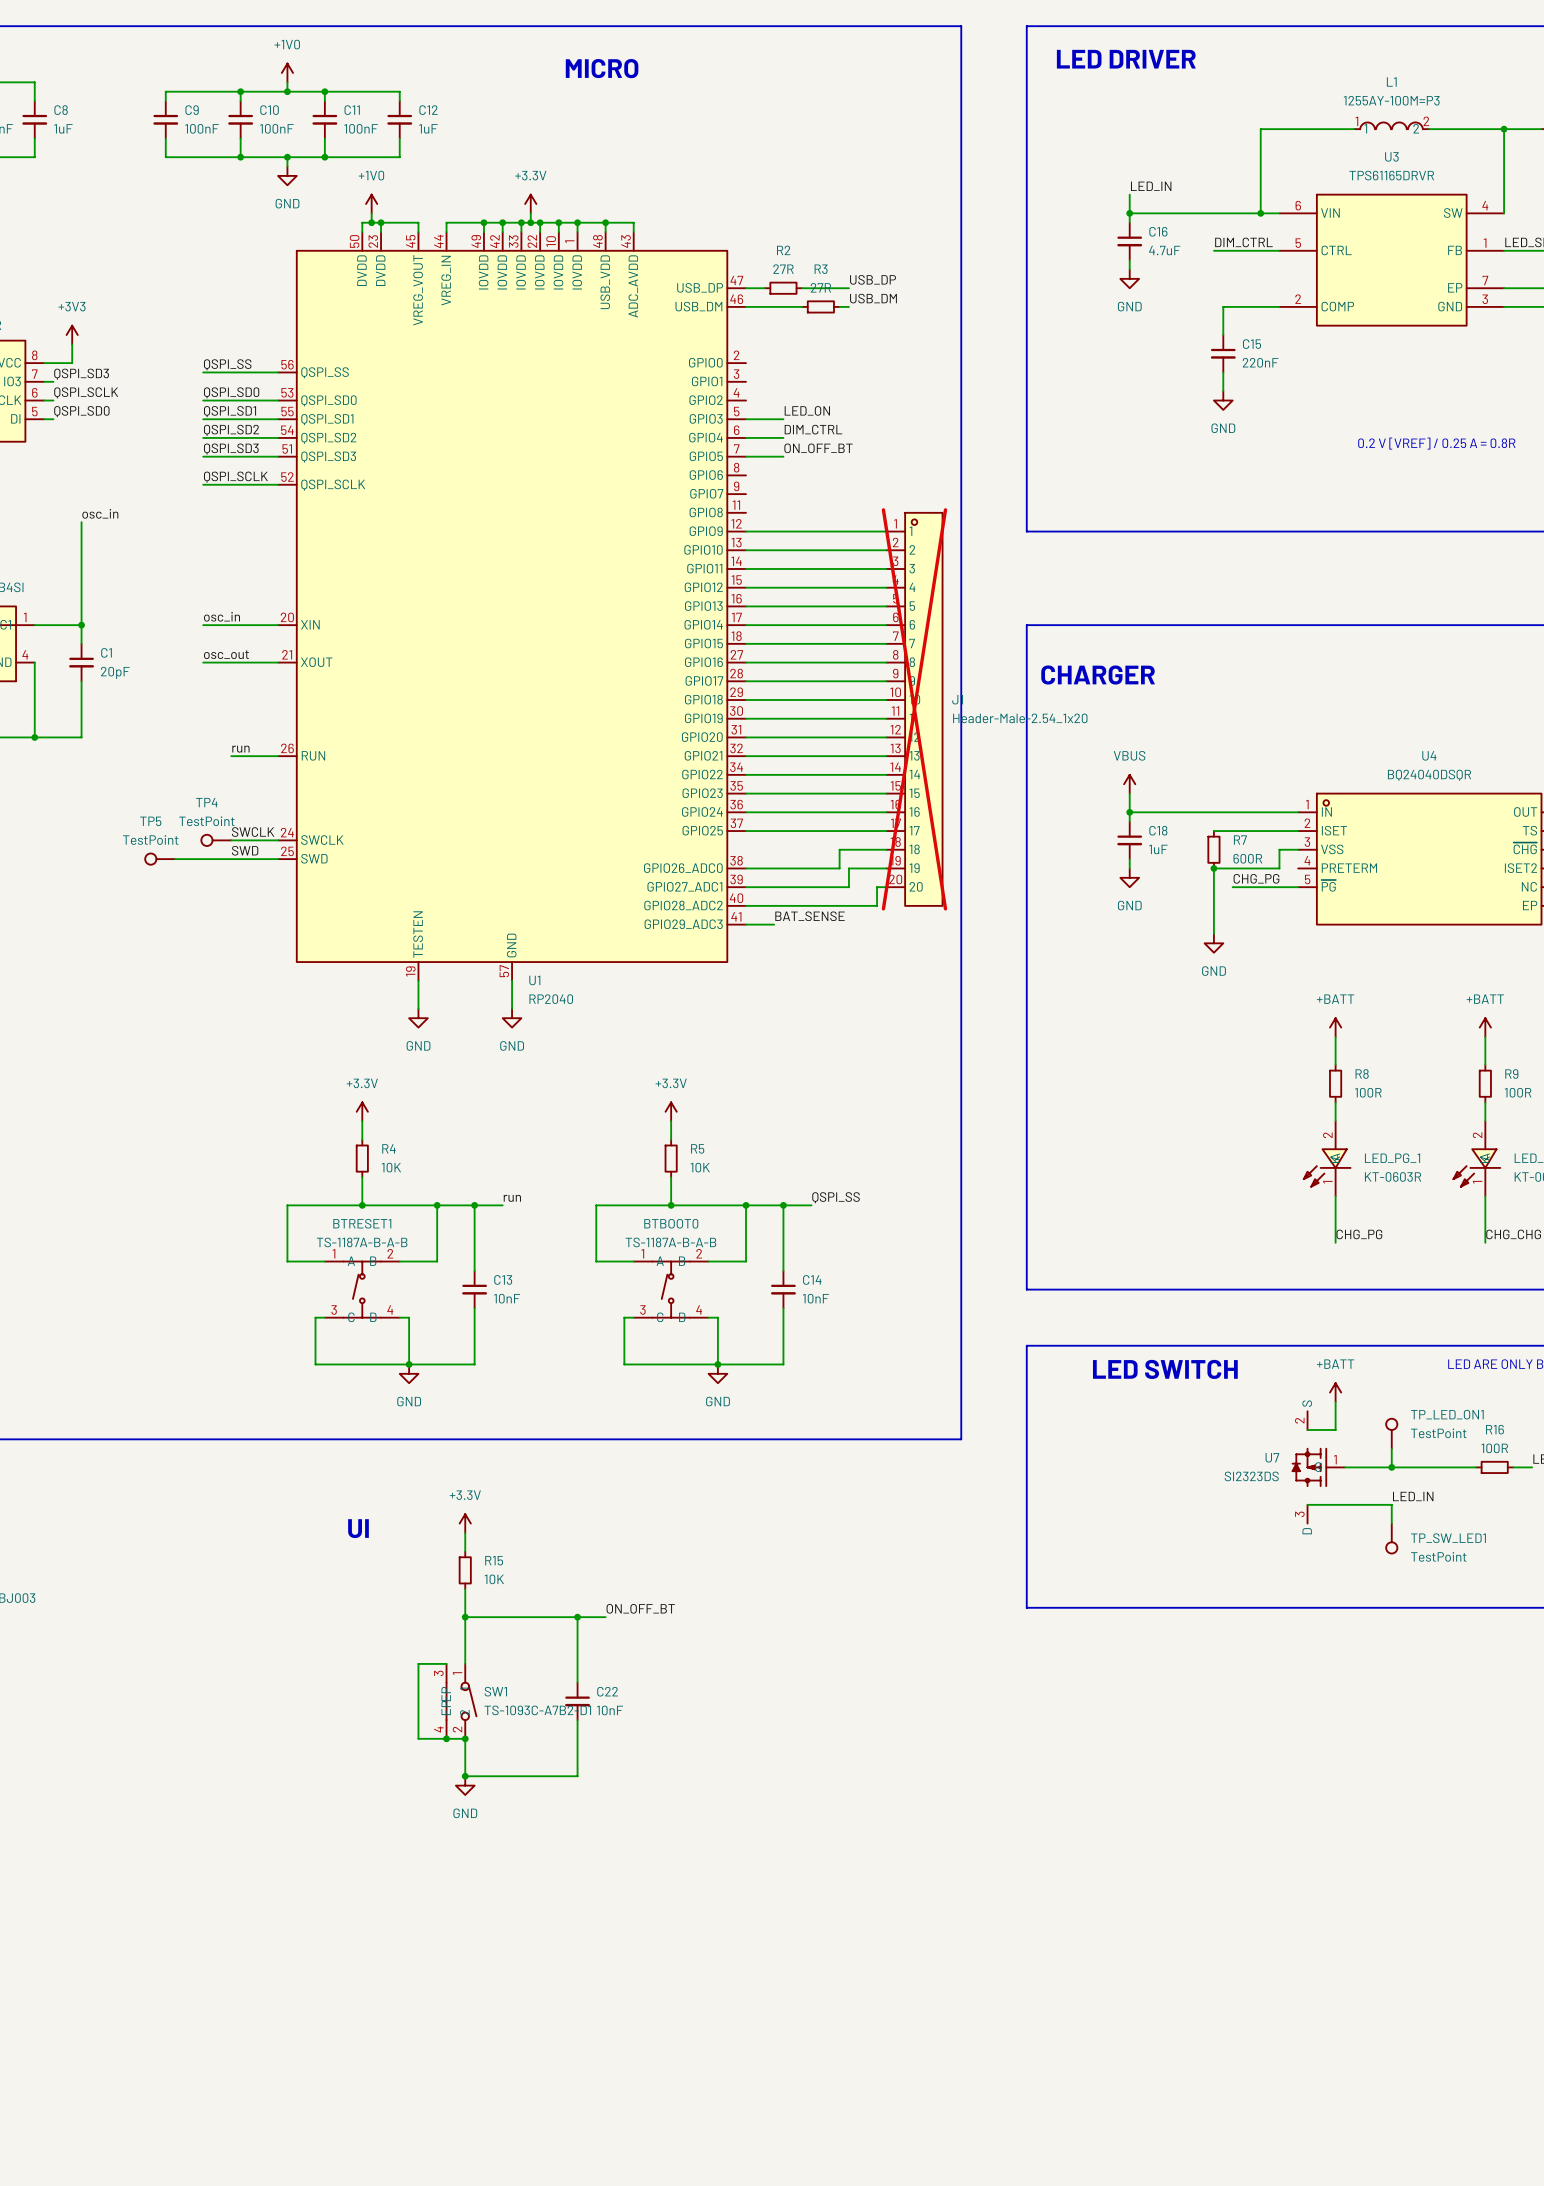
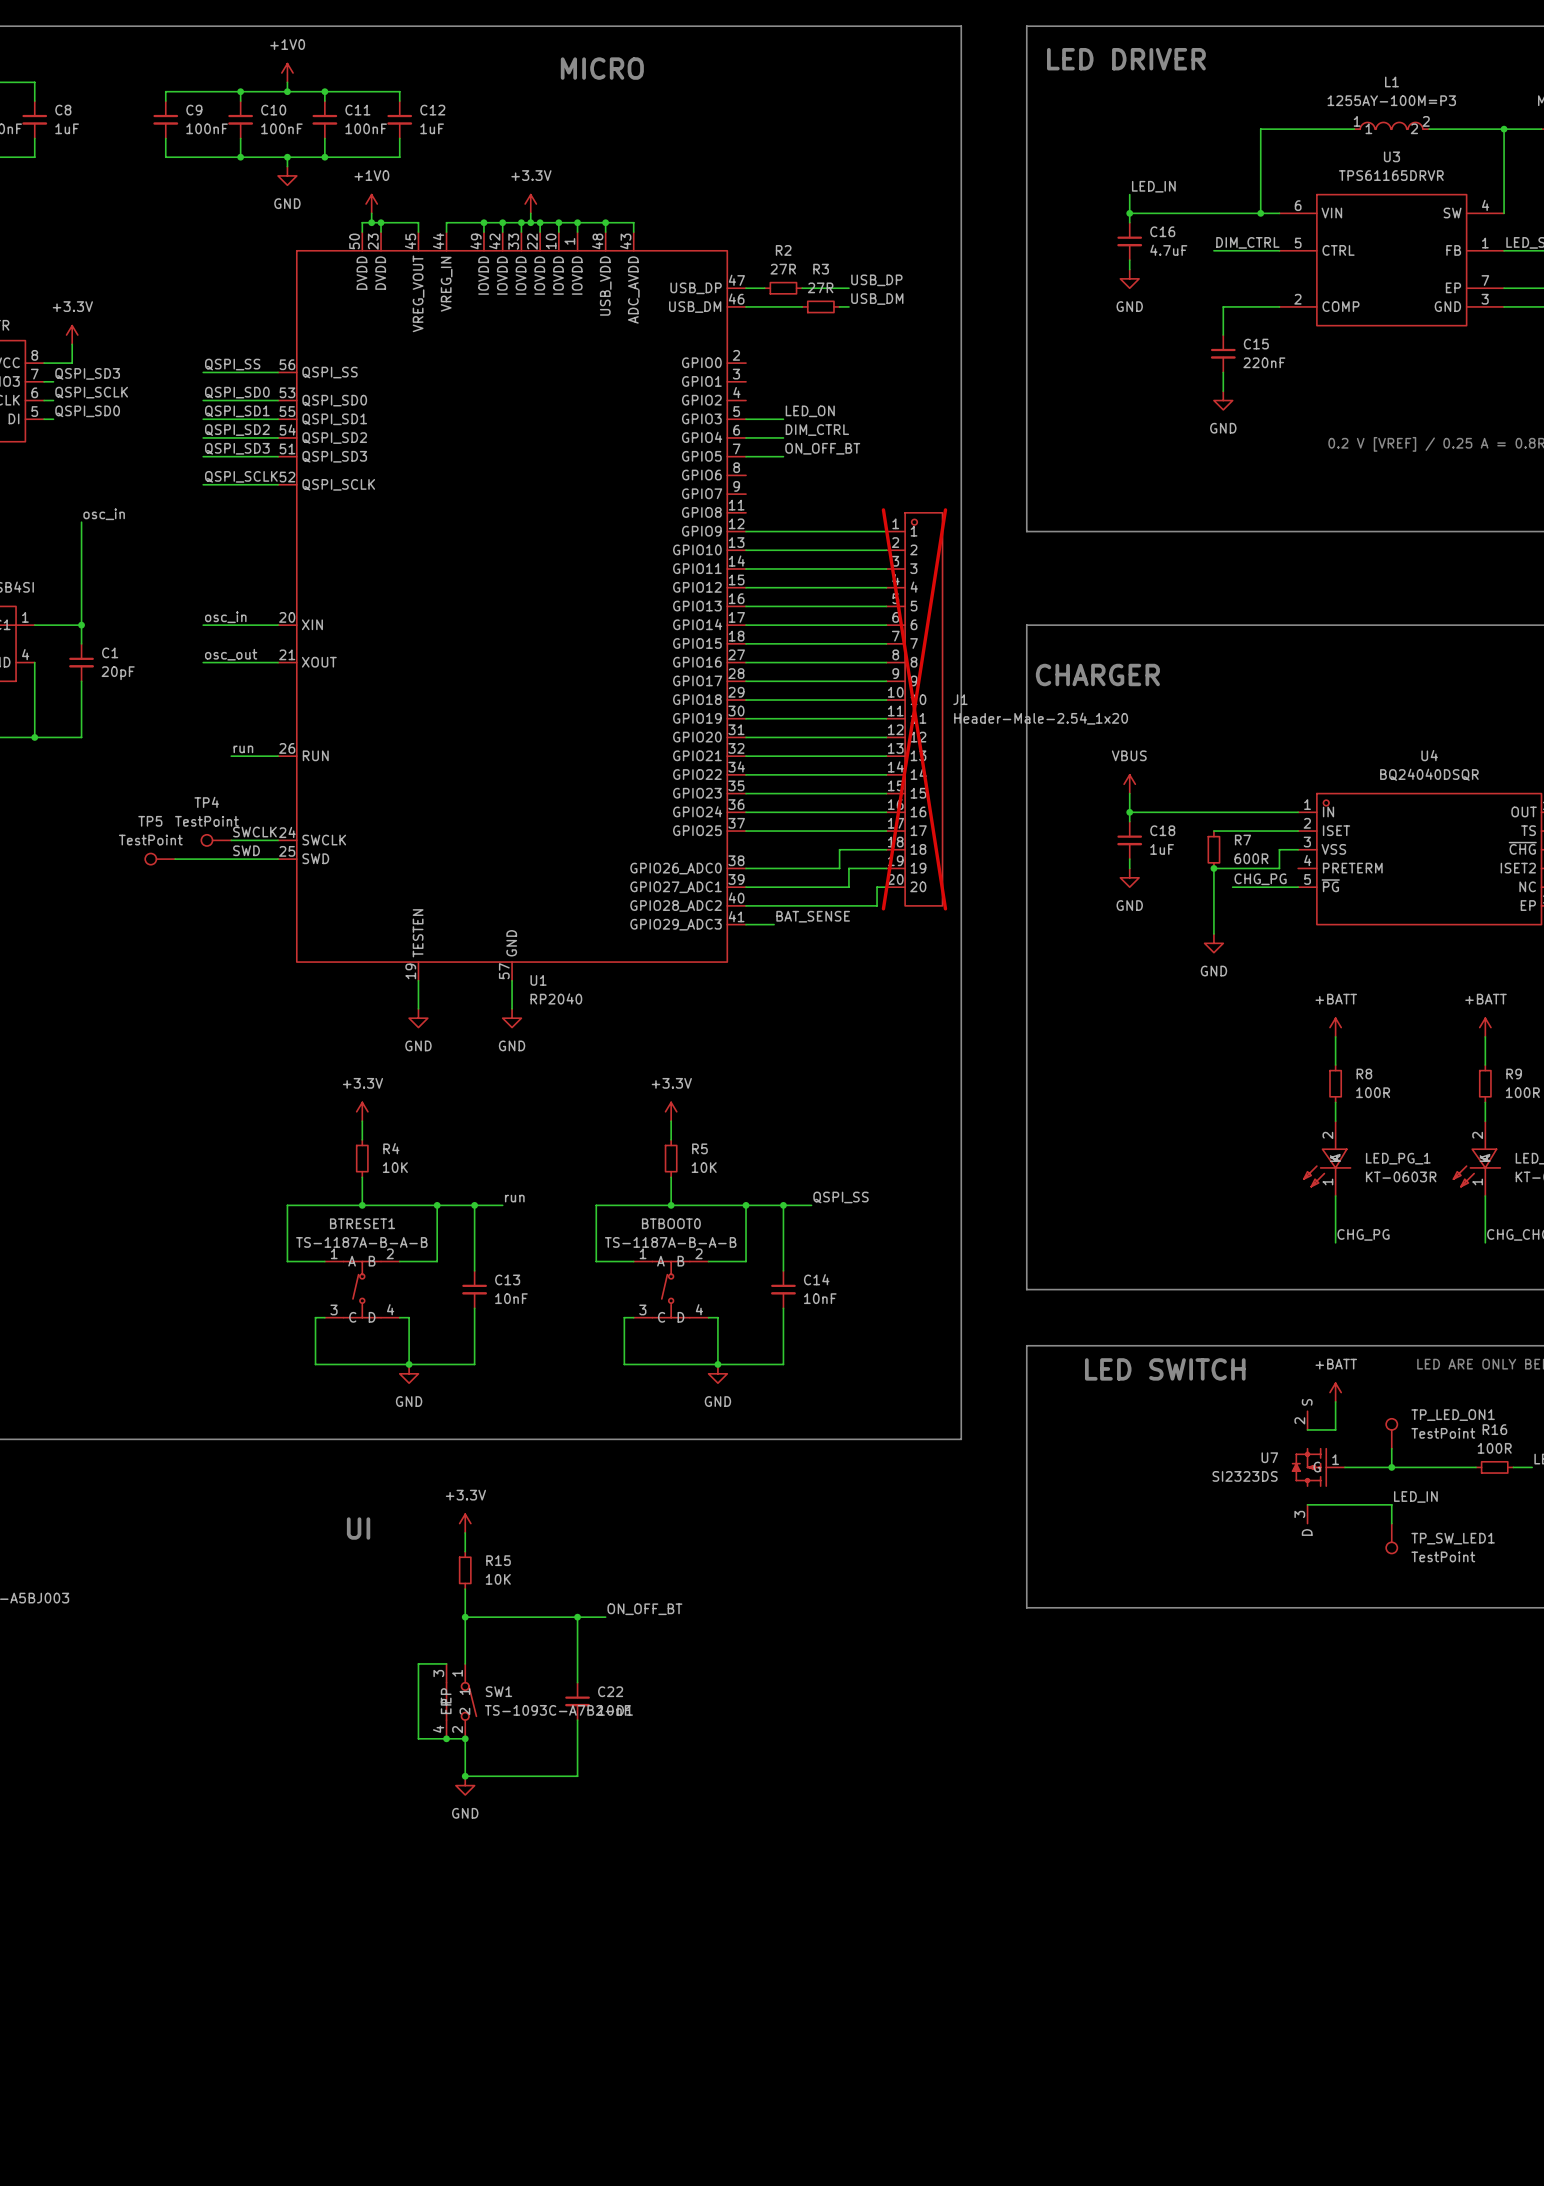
power symbol: +3V3 (72, 335) -> +3.3V (72, 335)

